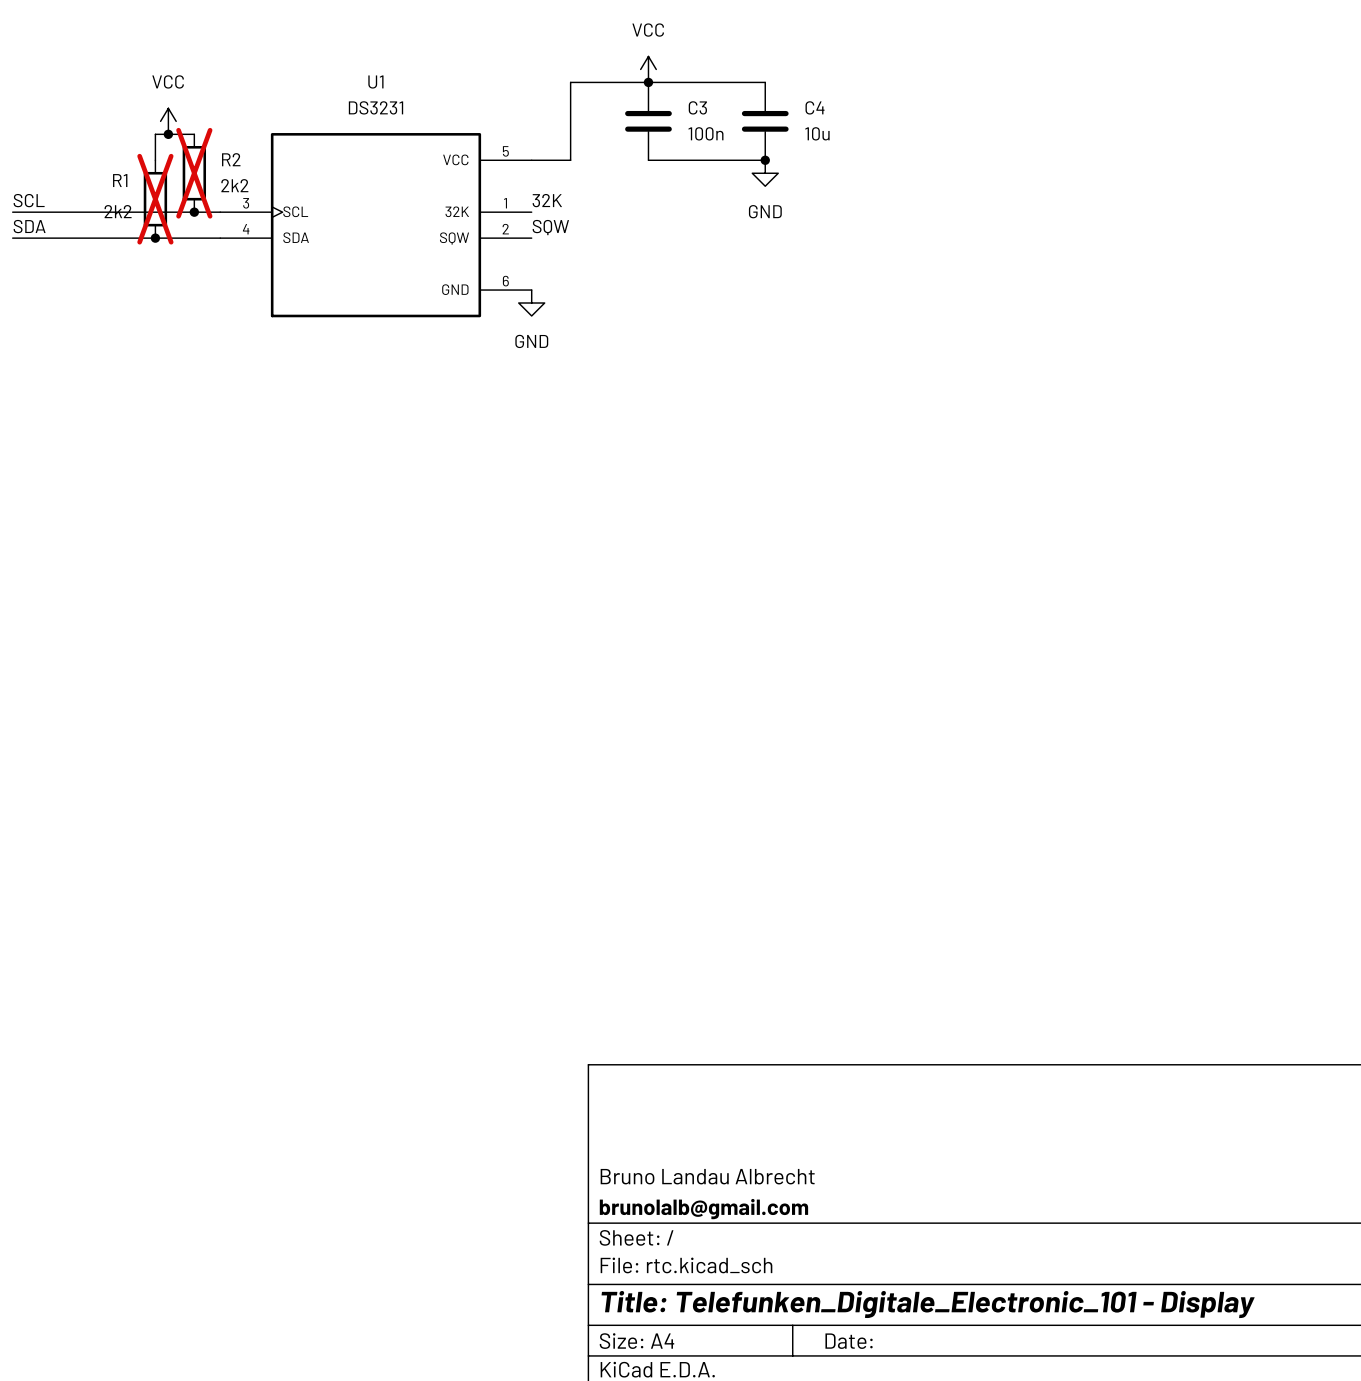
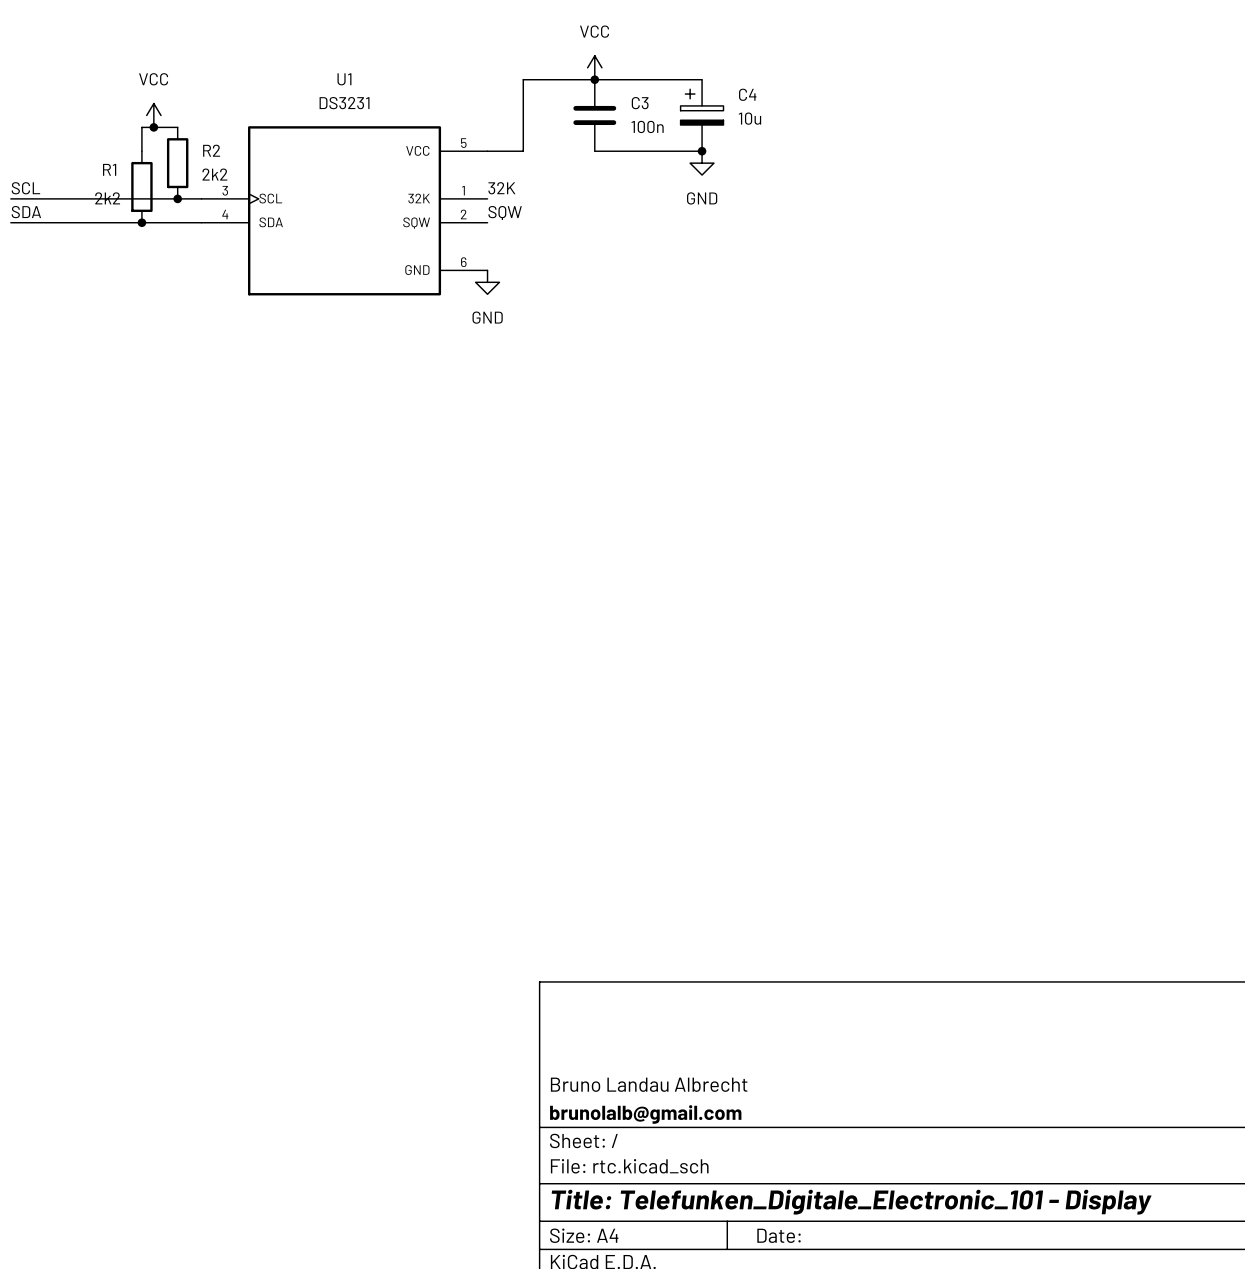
C4 symbol: [741, 82, 789, 161] -> [680, 79, 724, 152]
R2 do-not-place cross: (194, 173) -> none
R1 do-not-place cross: (155, 199) -> none

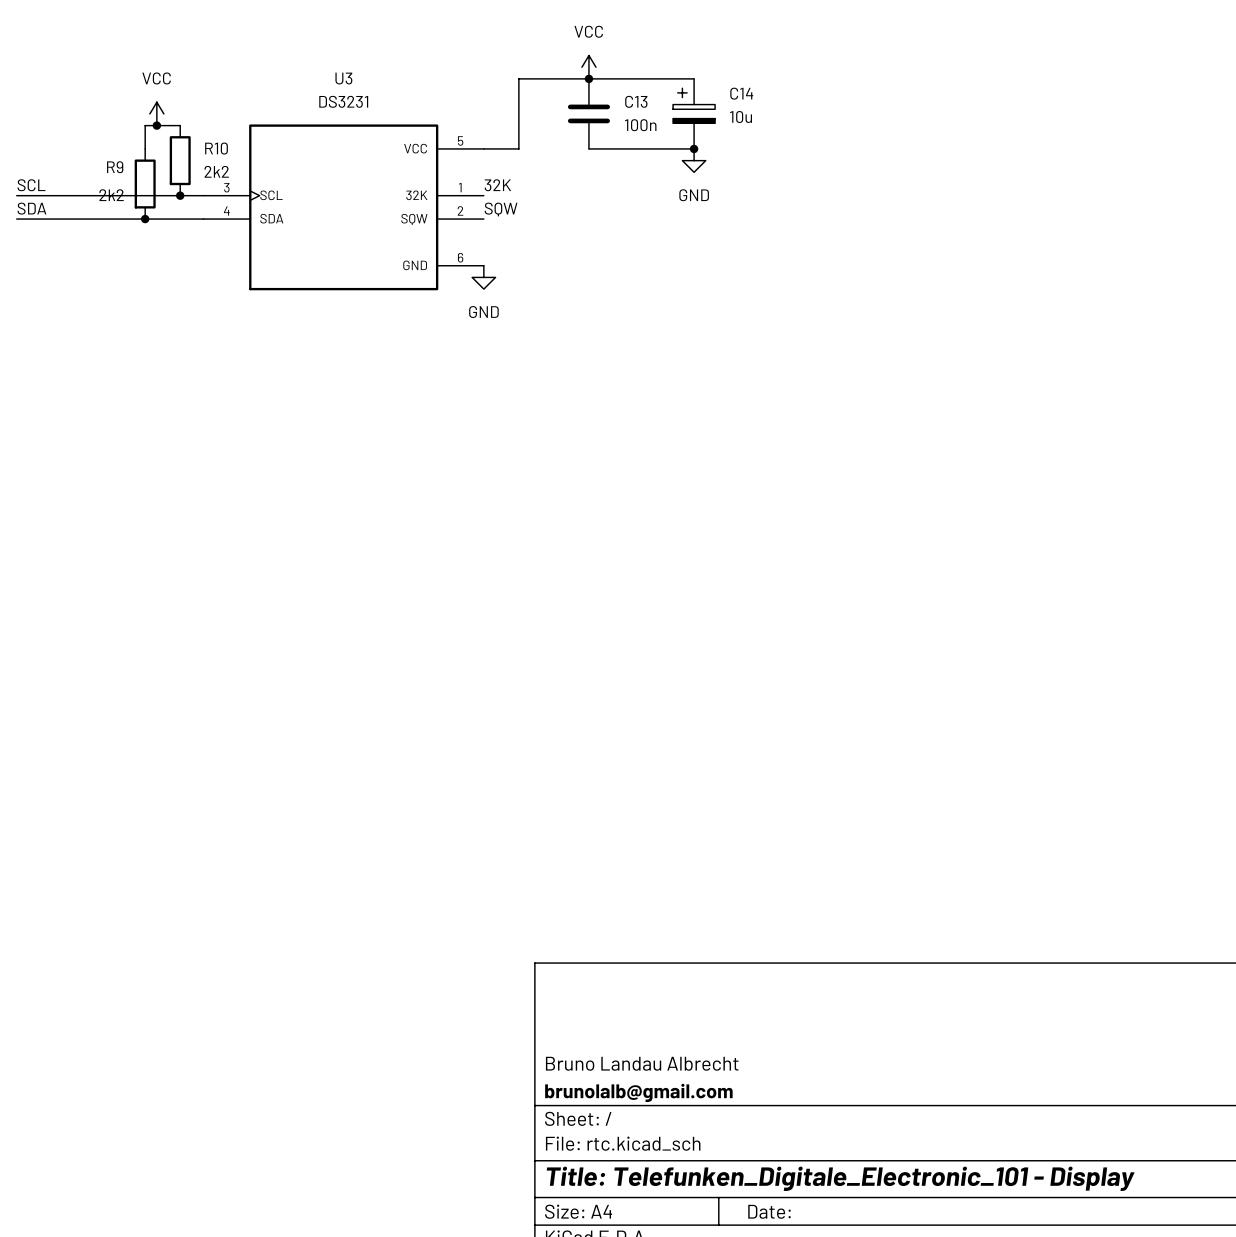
U1 name: U1 (344, 79) -> U3 (343, 78)
C4 name: C4 (747, 94) -> C14 (741, 93)
C3 name: C3 (640, 103) -> C13 (636, 101)
R2 name: R2 (211, 150) -> R10 (216, 148)
R1 name: R1 (109, 169) -> R9 (115, 167)

